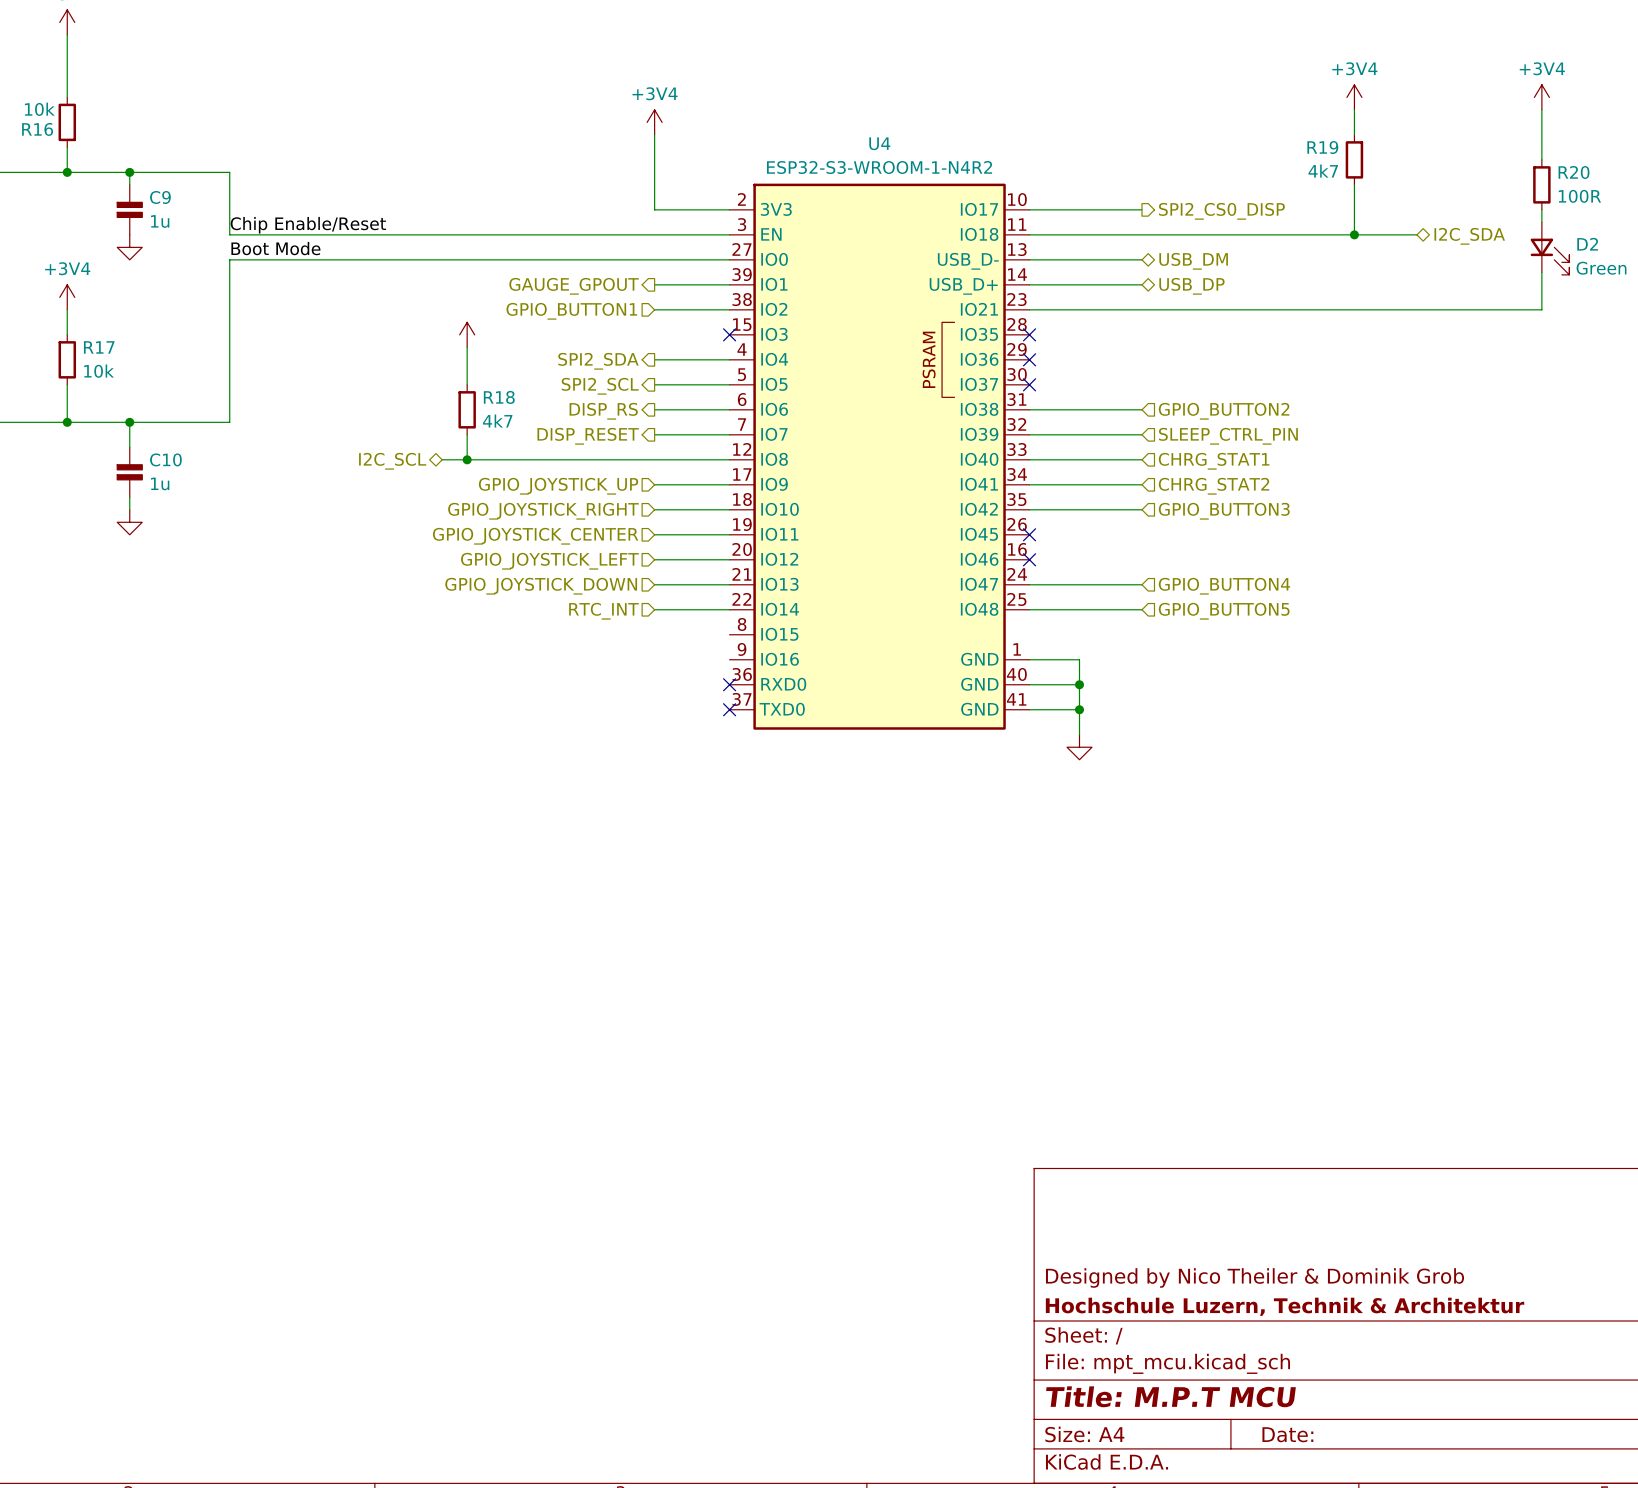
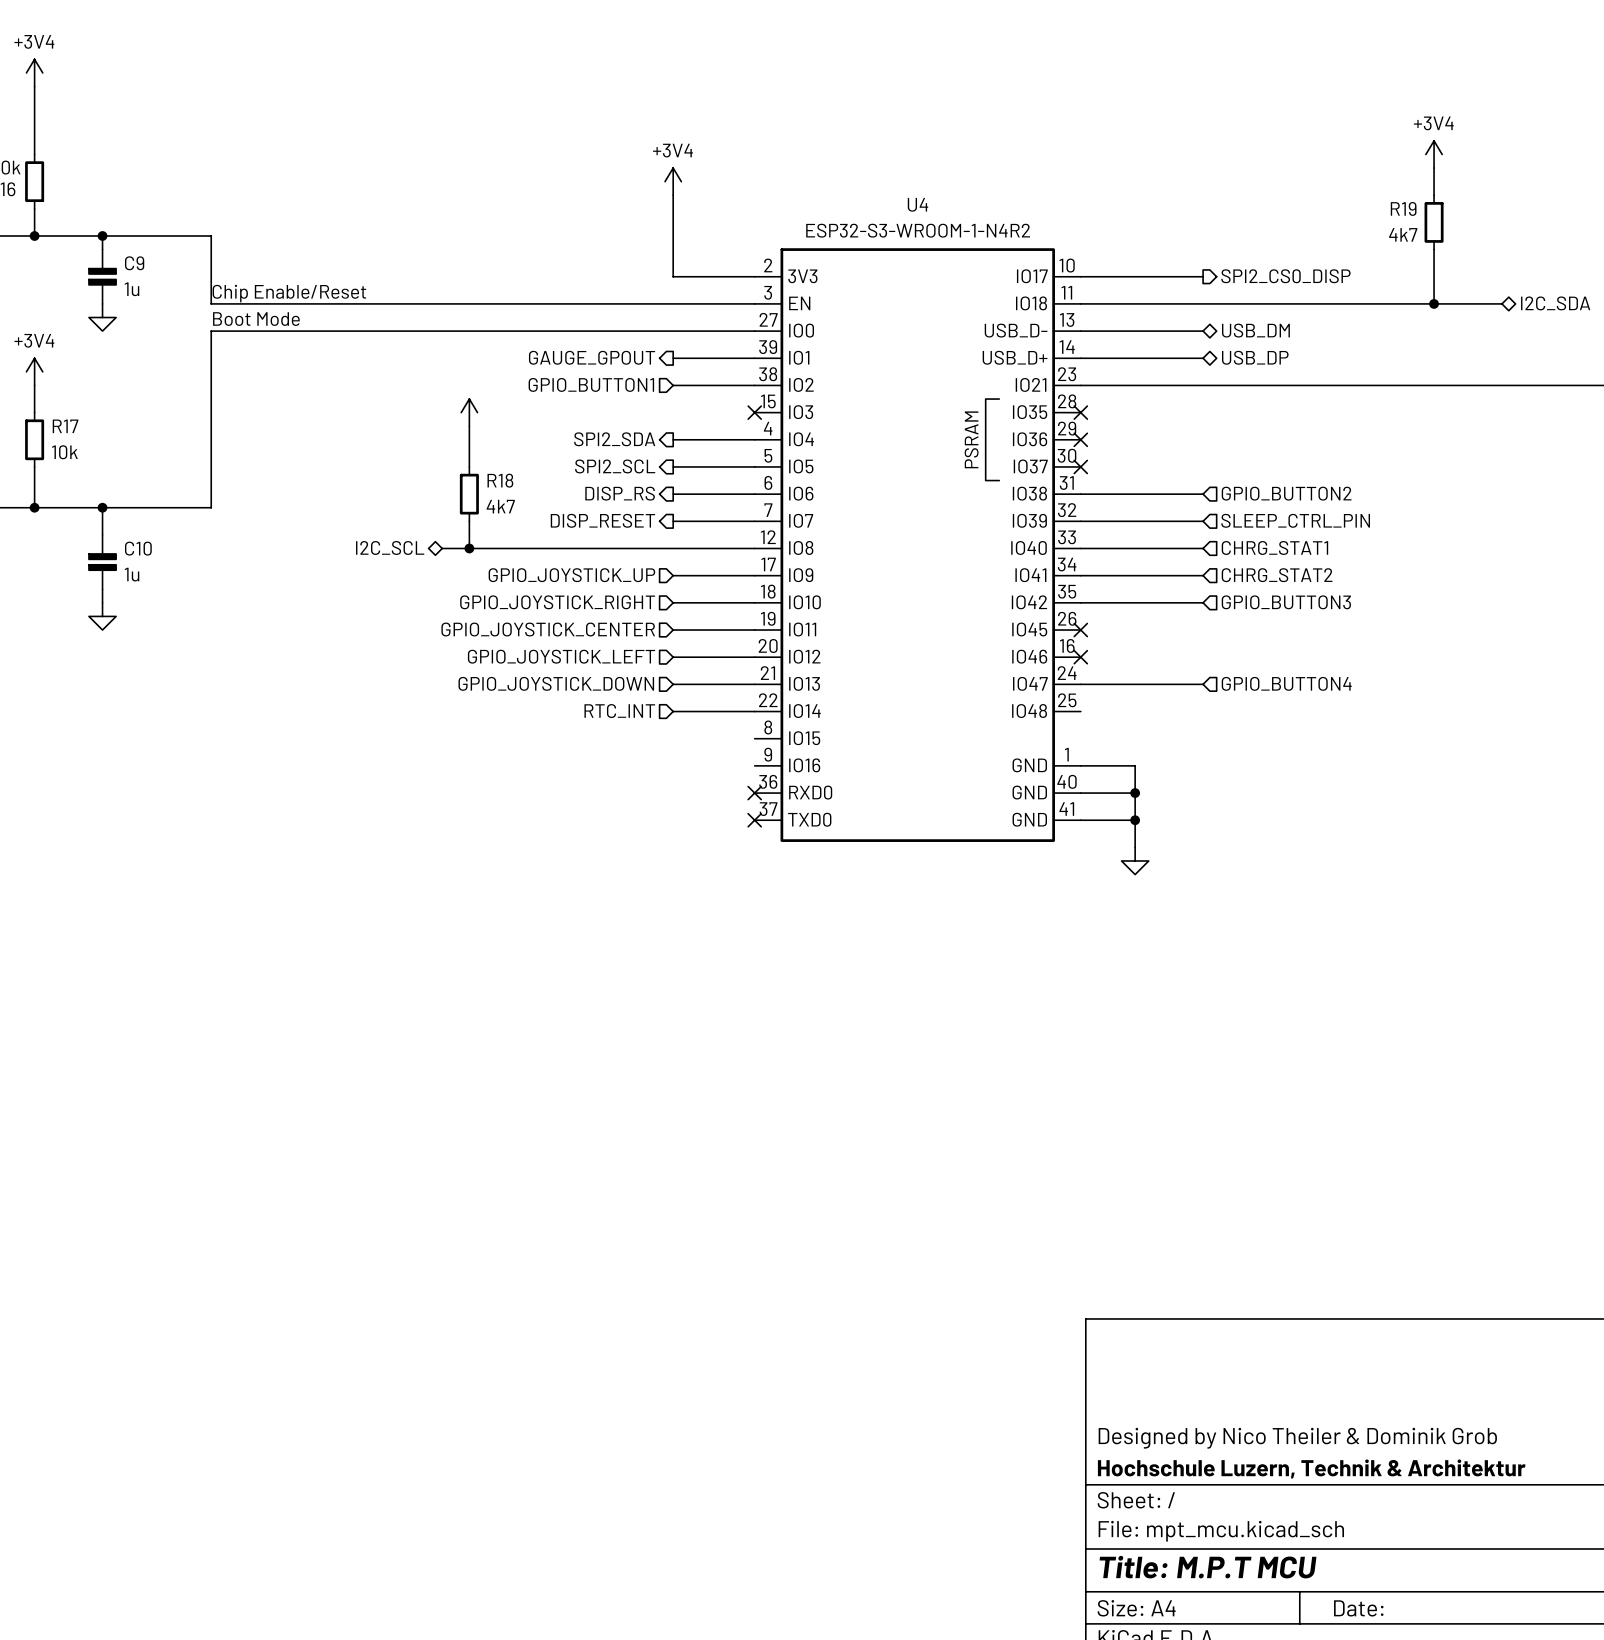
wire: (1029, 609) (1141, 609) -> none
hierarchical label: GPIO_BUTTON5 (1224, 611) -> none

